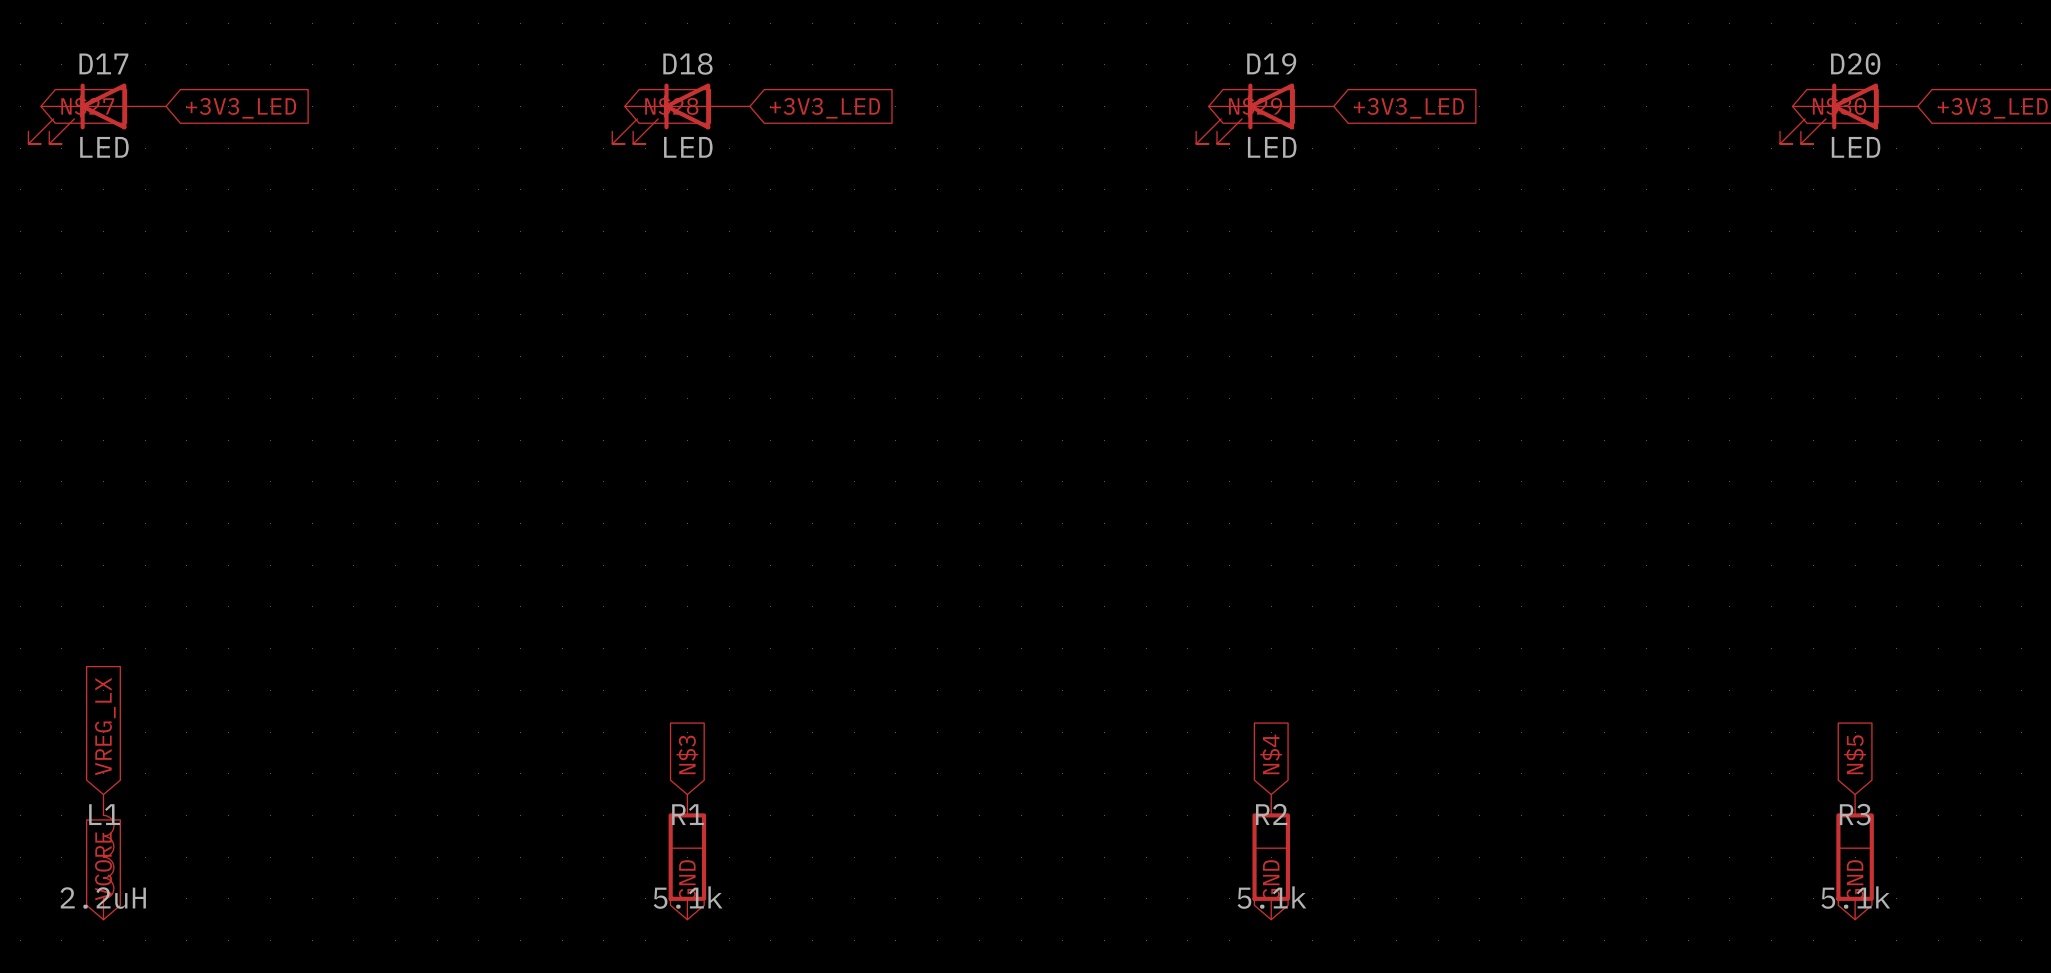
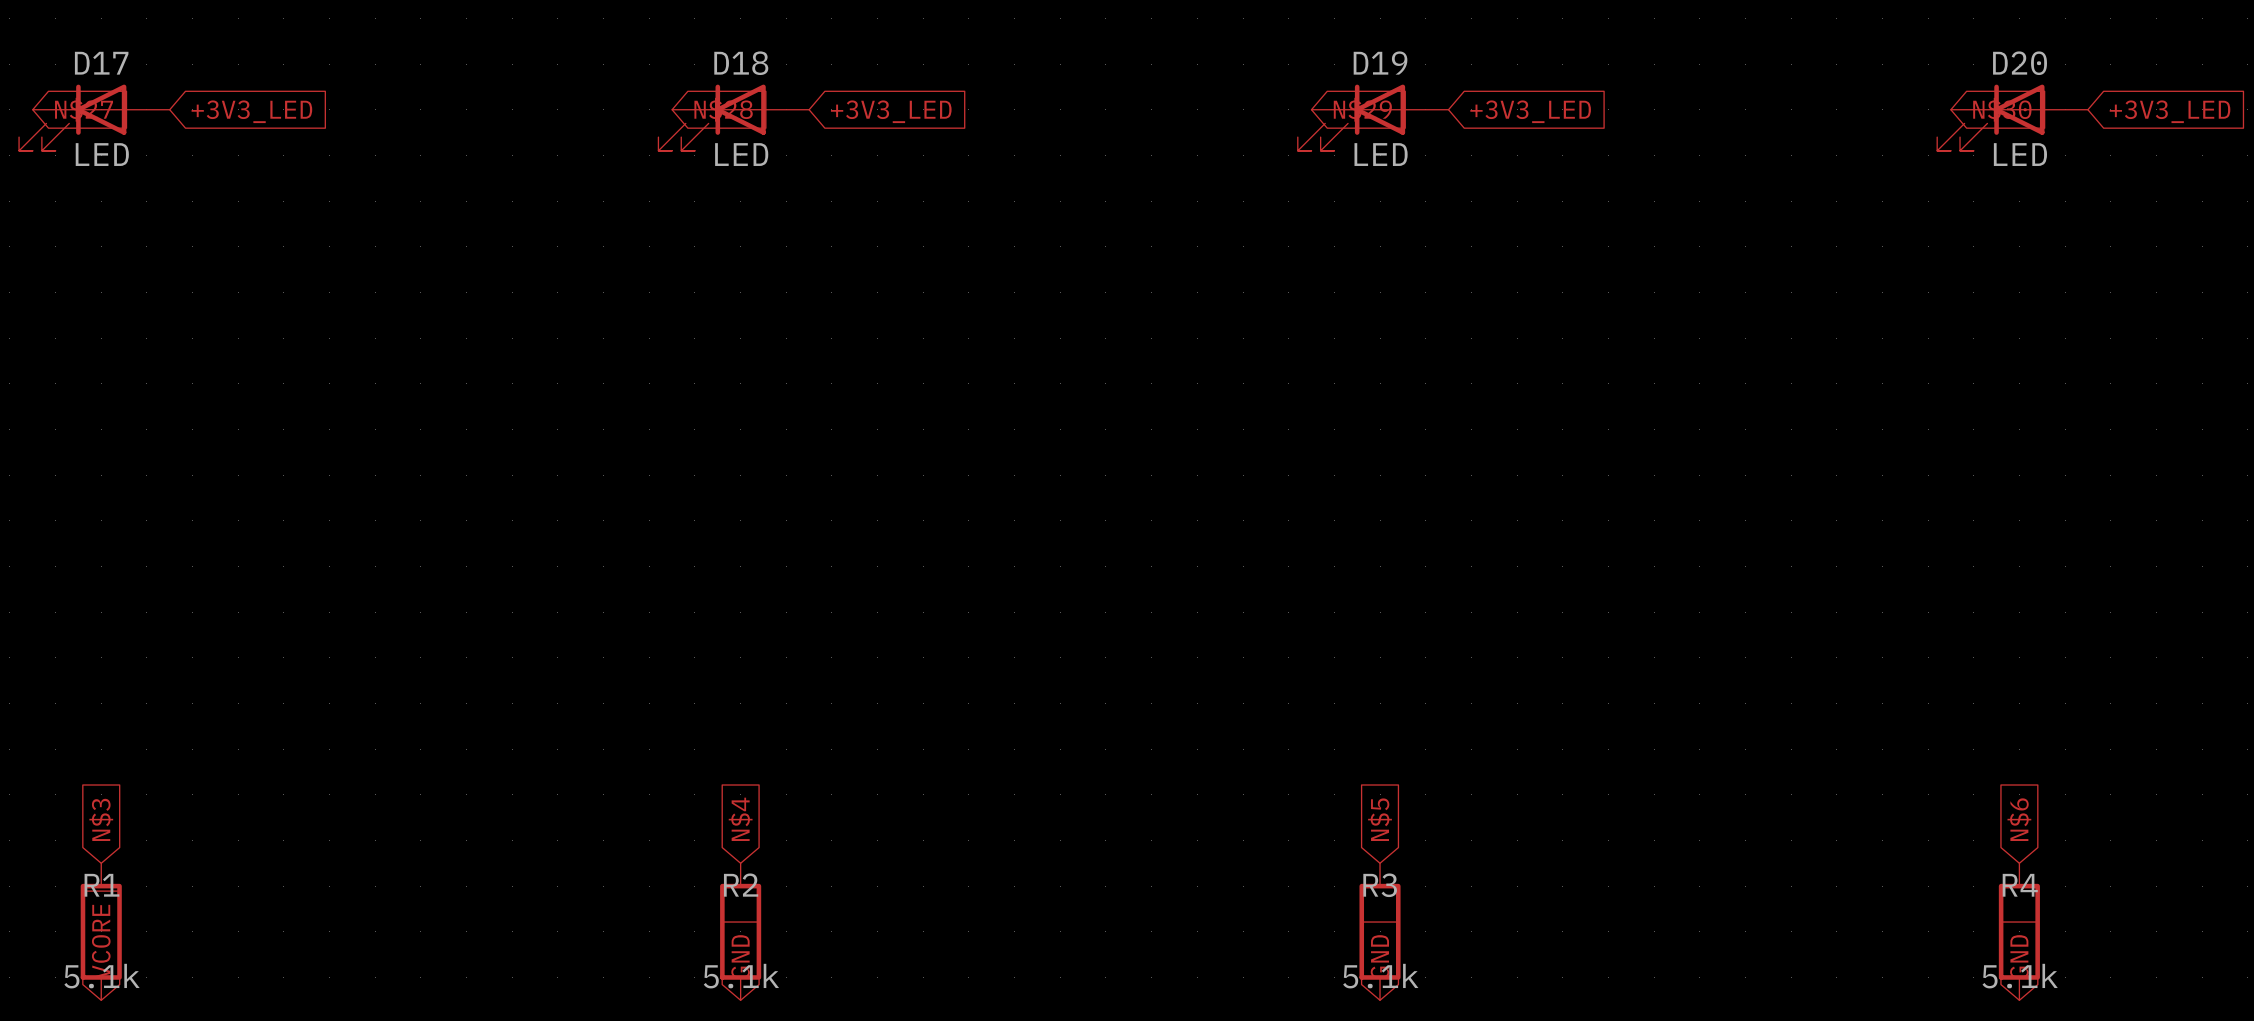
global label: VREG_LX (105, 726) -> N$3 (101, 819)
global label: N$3 (687, 754) -> N$4 (740, 819)
global label: N$4 (1271, 754) -> N$5 (1380, 819)
global label: N$5 (1855, 754) -> N$6 (2019, 819)
R1 name: R1 (688, 814) -> R2 (741, 885)
R2 name: R2 (1271, 814) -> R3 (1380, 885)
R3 name: R3 (1855, 814) -> R4 (2020, 885)
R1: none -> 5.1k (101, 931)
L1: 2.2uH (108, 857) -> none

